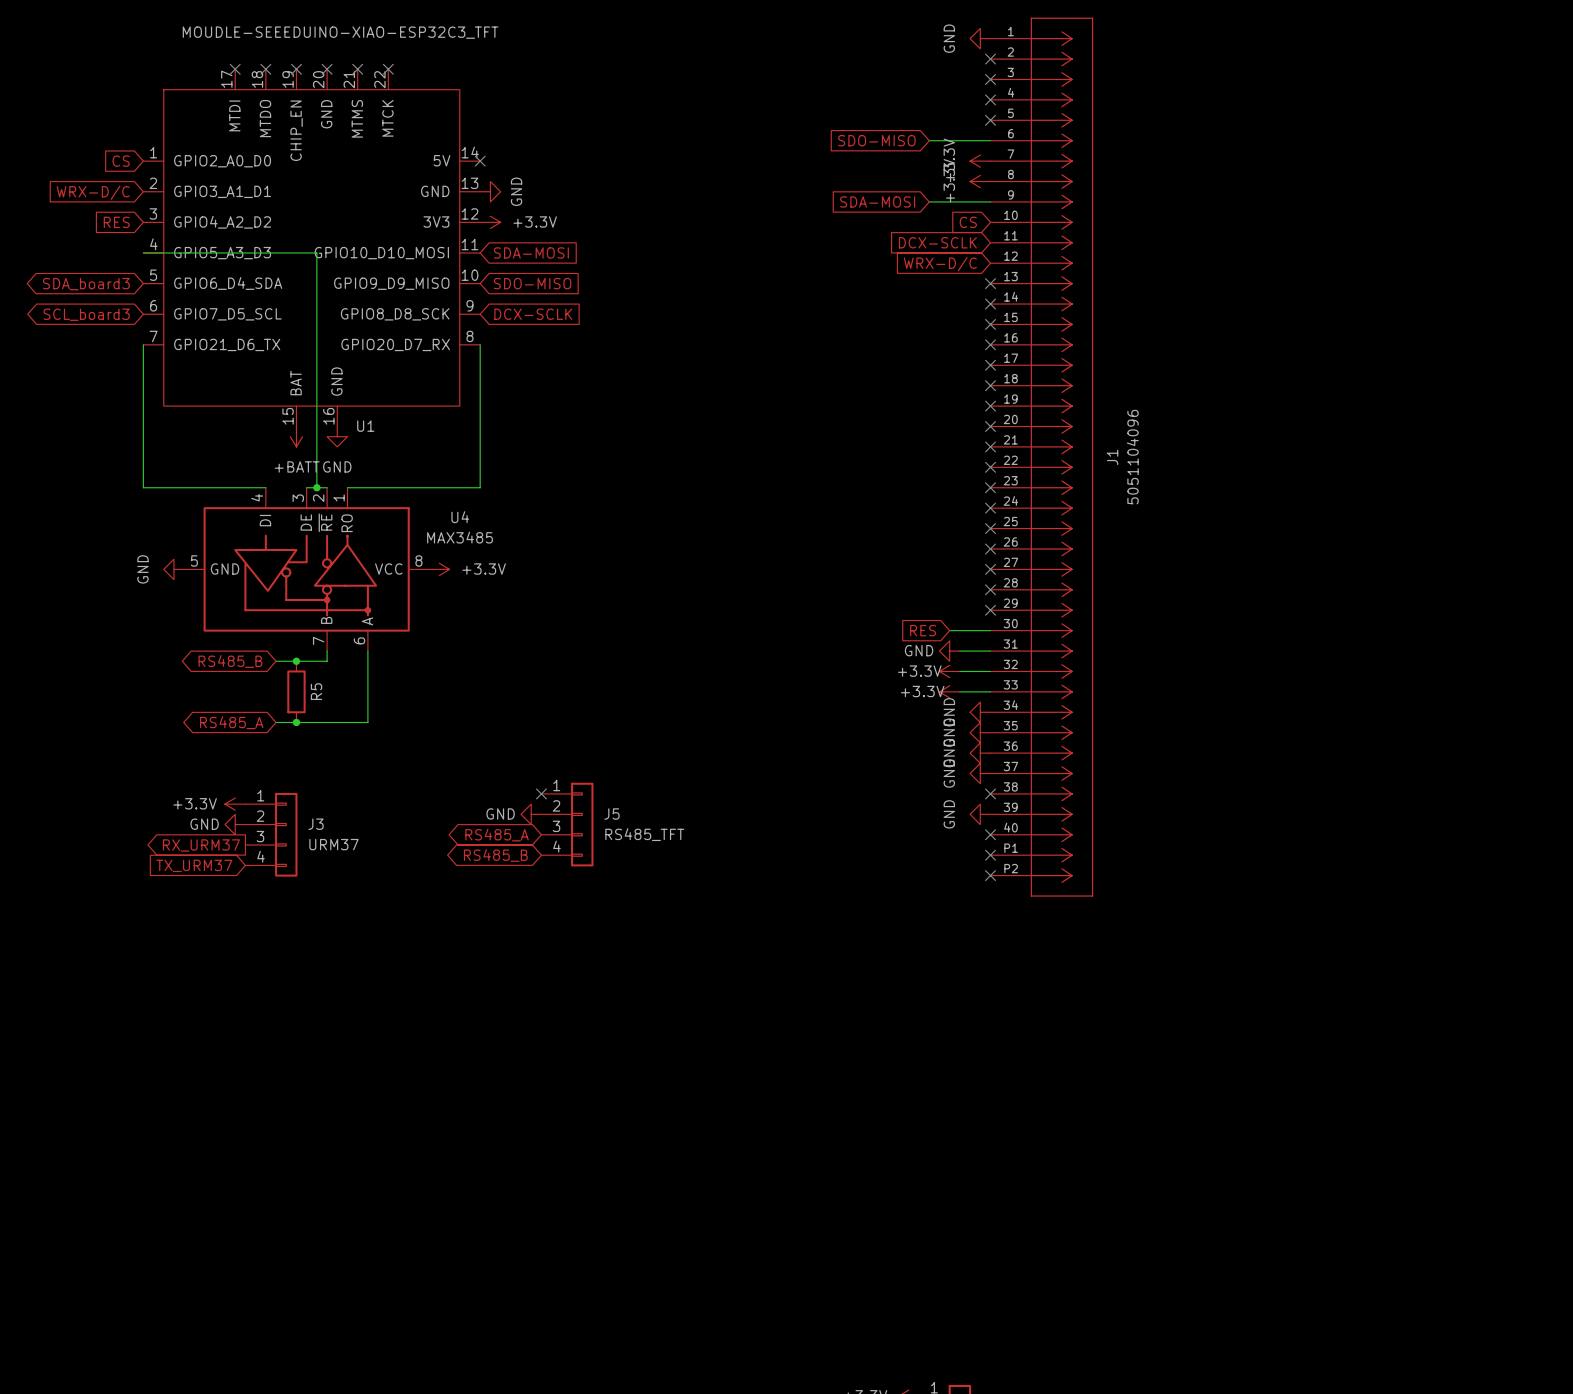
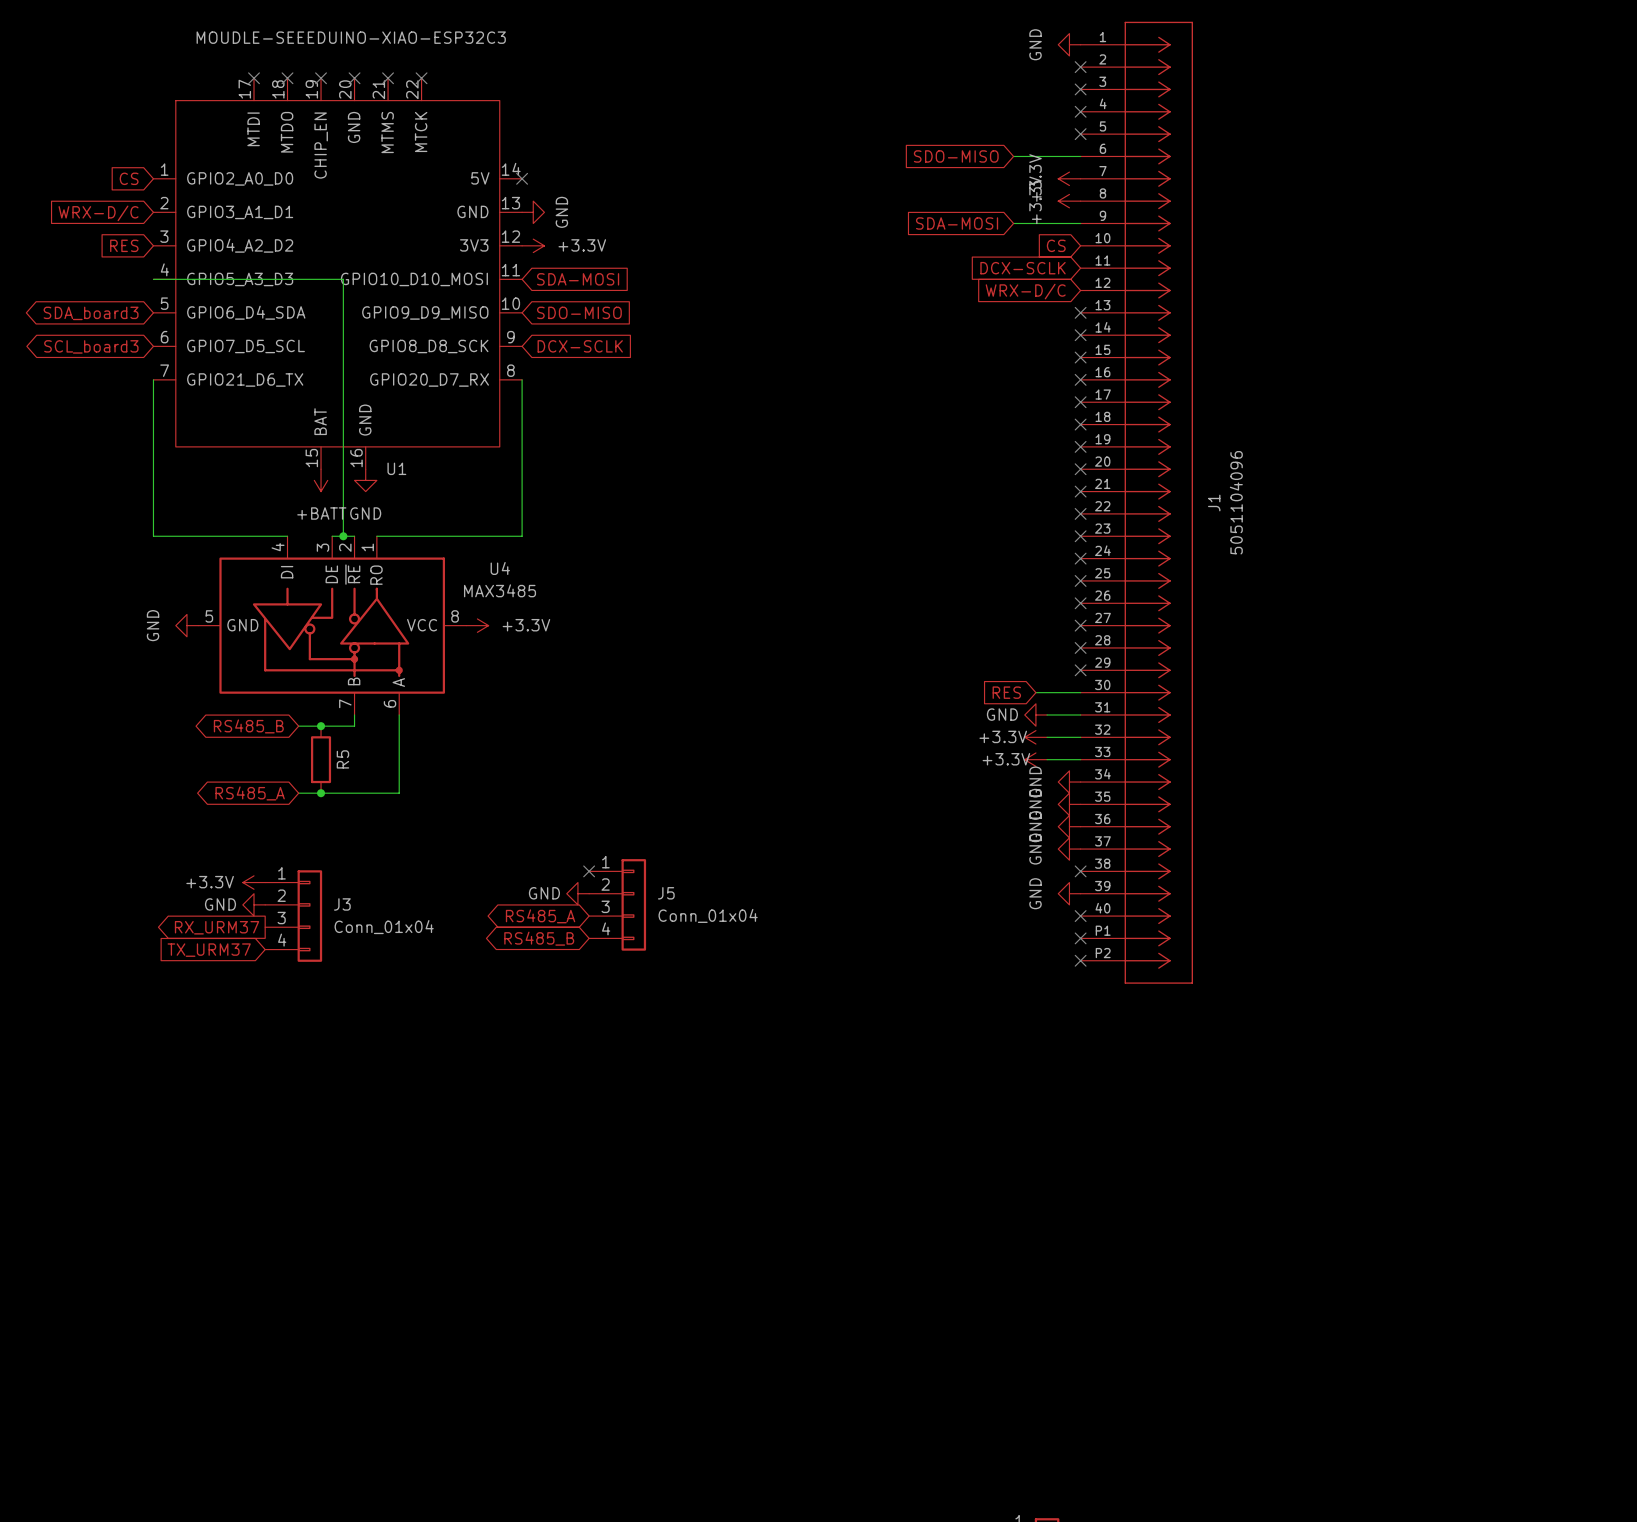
U1 value: MOUDLE-SEEEDUINO-XIAO-ESP32C3_TFT (340, 32) -> MOUDLE-SEEEDUINO-XIAO-ESP32C3 (351, 37)
J5 value: RS485_TFT (644, 834) -> Conn_01x04 (708, 915)
J3 value: URM37 (333, 844) -> Conn_01x04 (384, 927)

